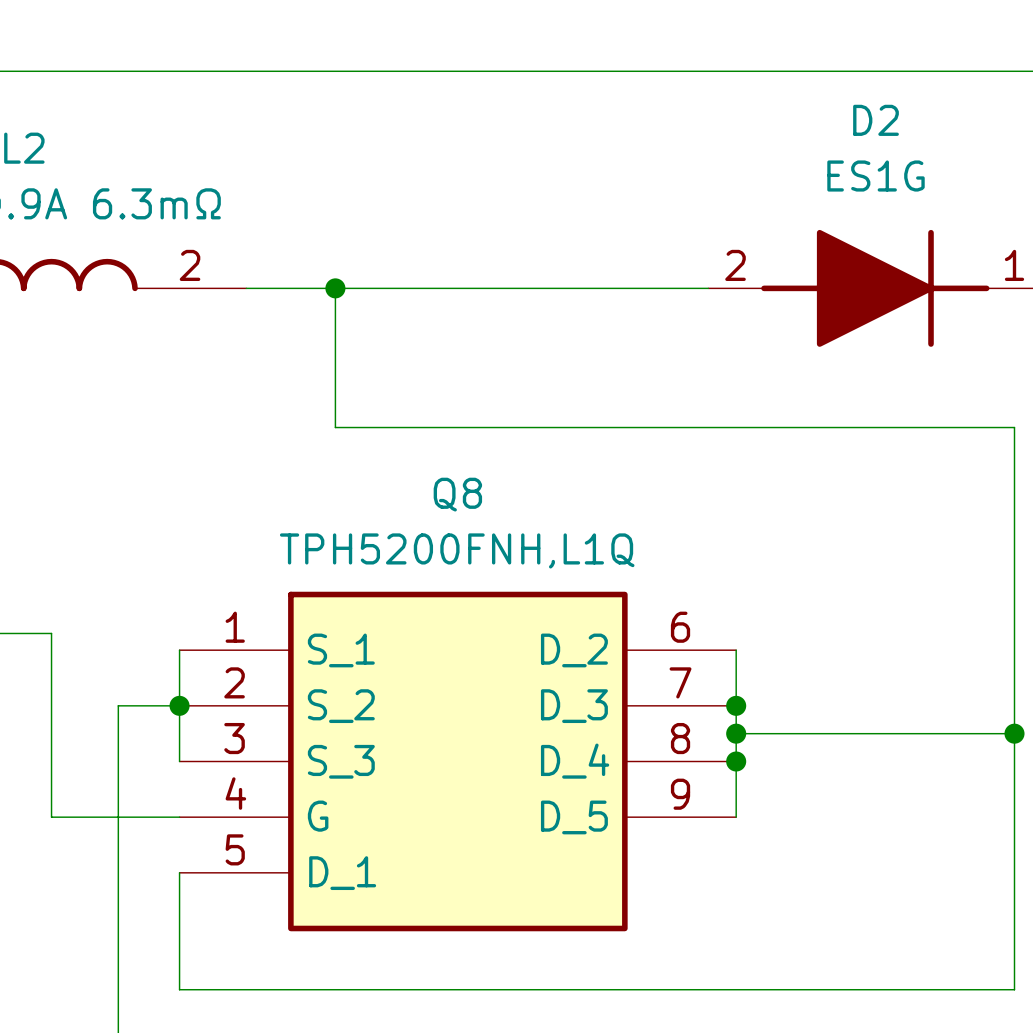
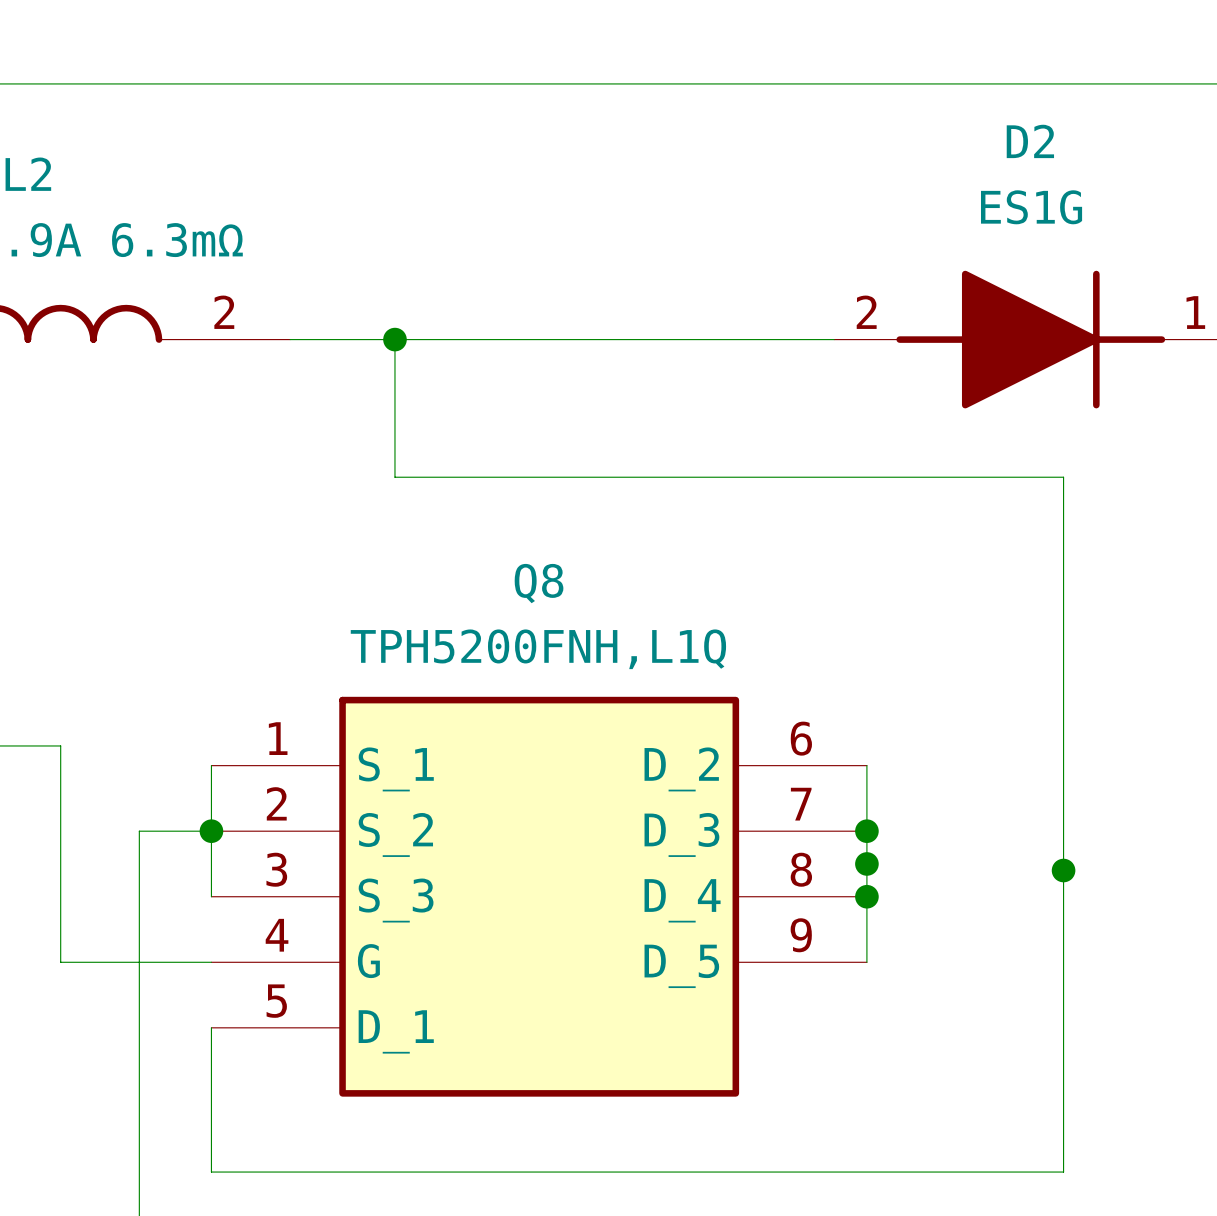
wire: (335, 405) (335, 427) (1014, 427) (1014, 989) (179, 989) -> (394, 477) (1063, 477) (1063, 1172) (211, 1172) (211, 1165)
wire: (736, 733) (1014, 733) -> none
junction position: (1014, 733) -> (1063, 870)

